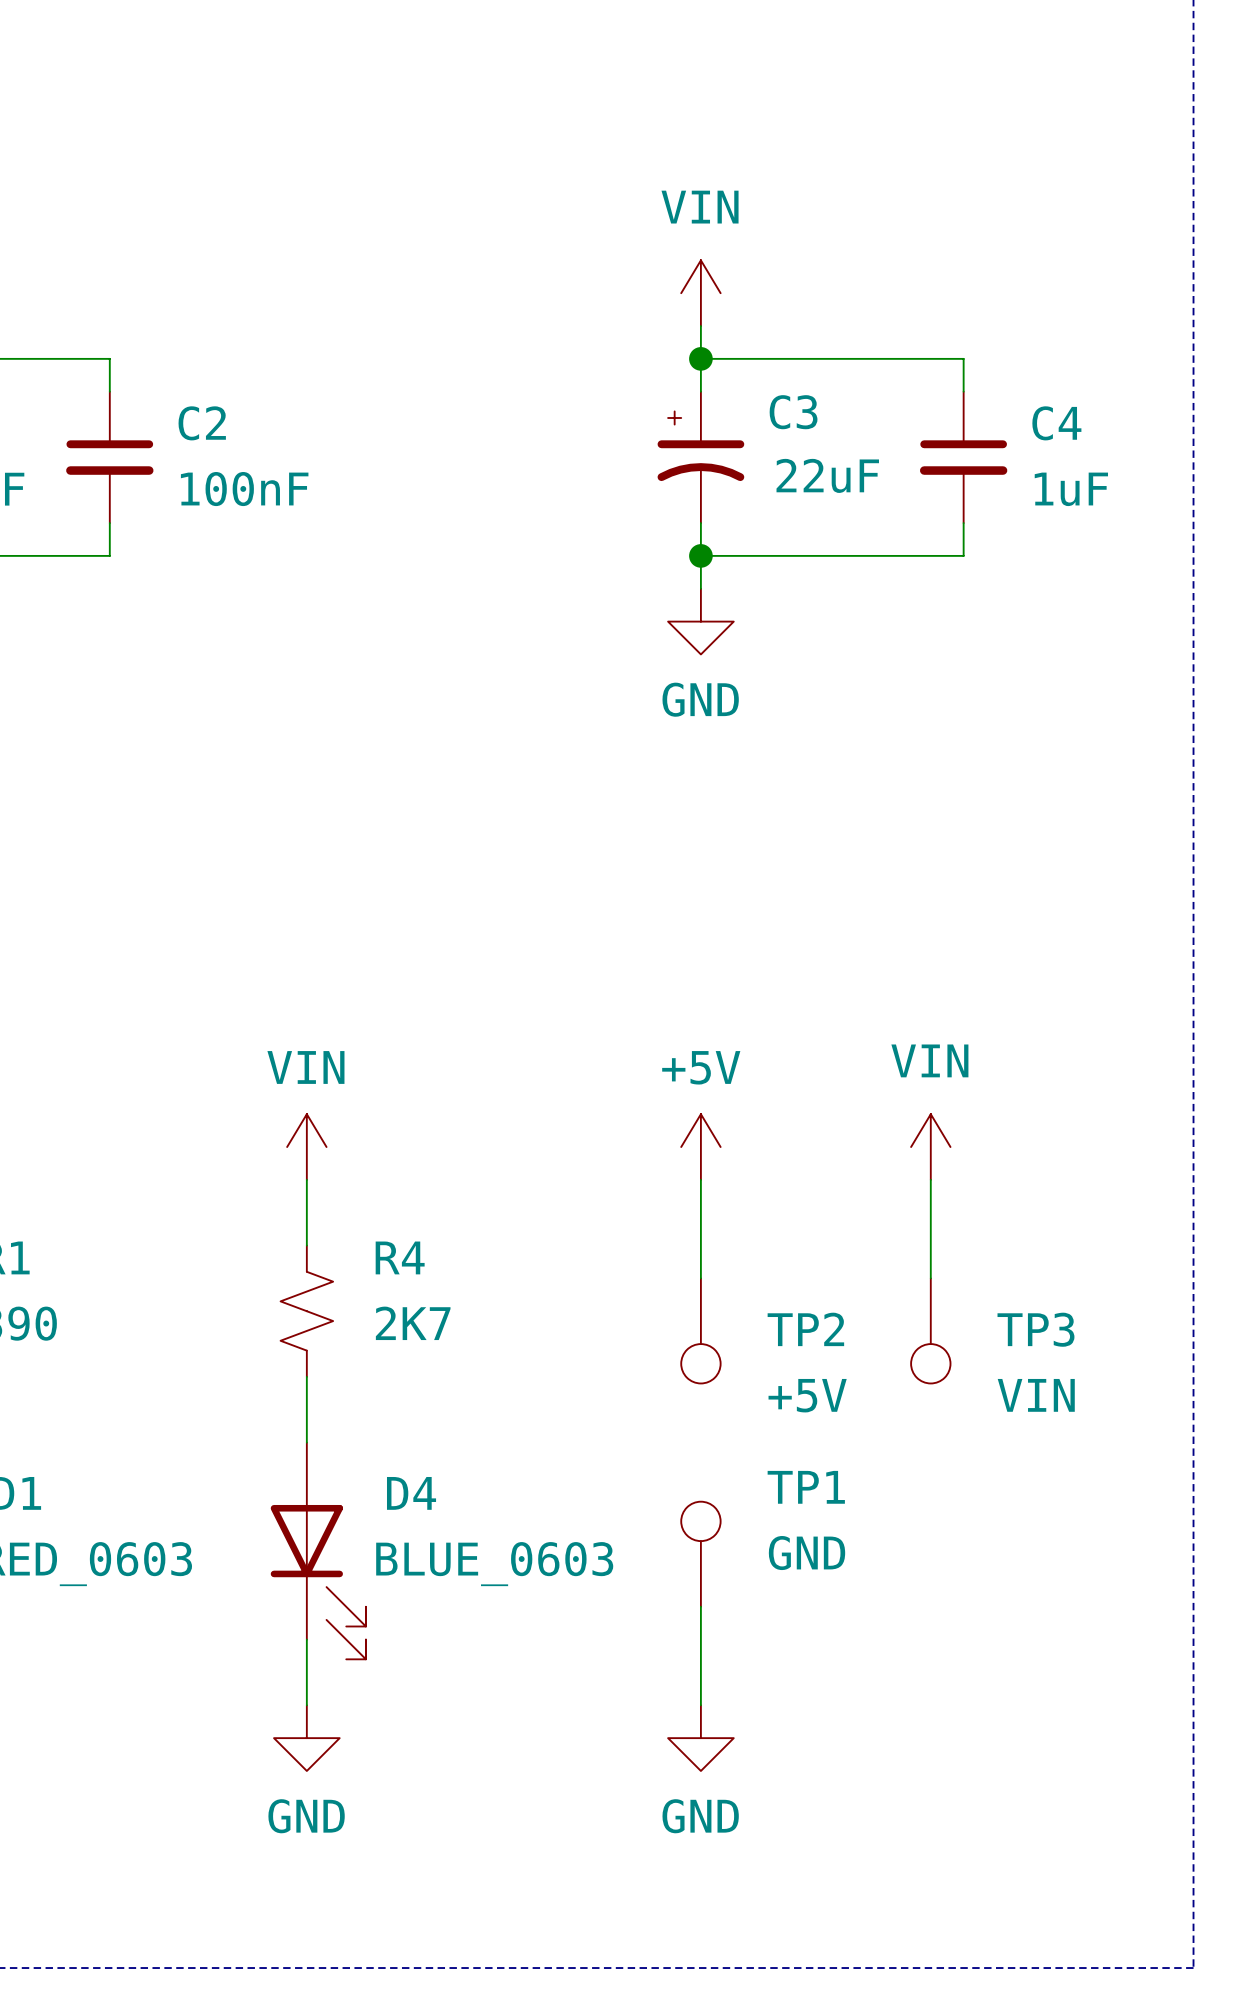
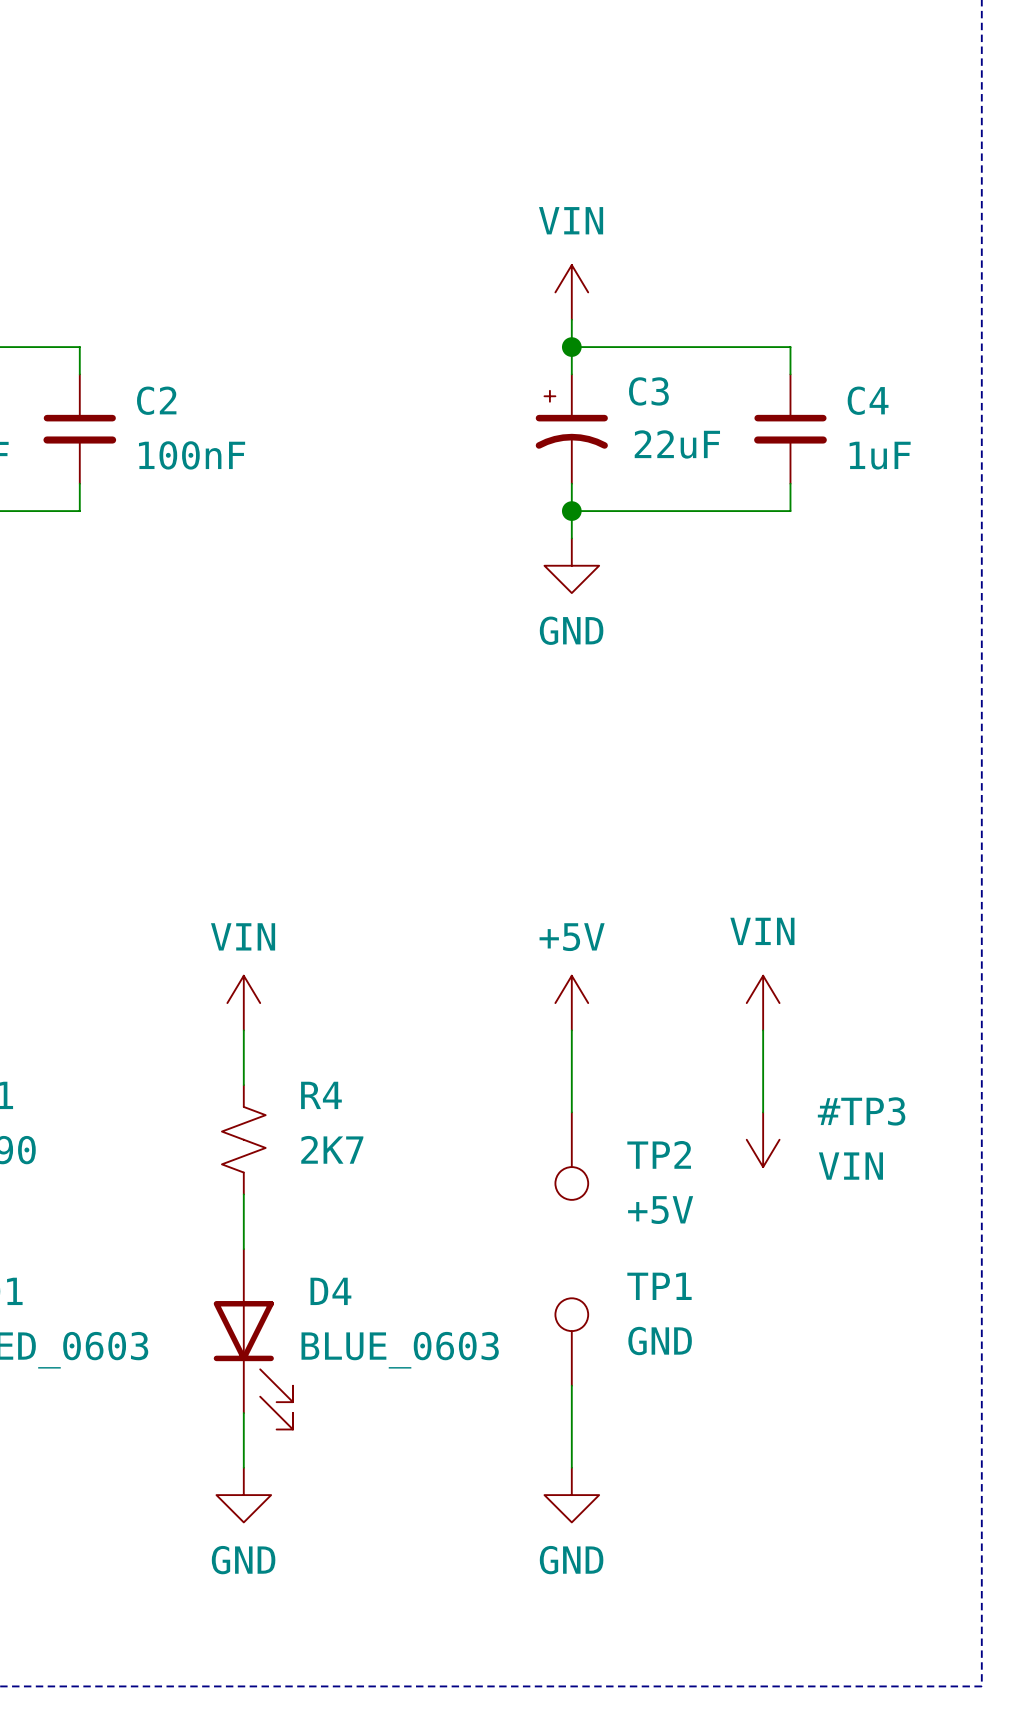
#TP3: none -> VIN (763, 1139)
TP3: VIN (930, 1330) -> none

